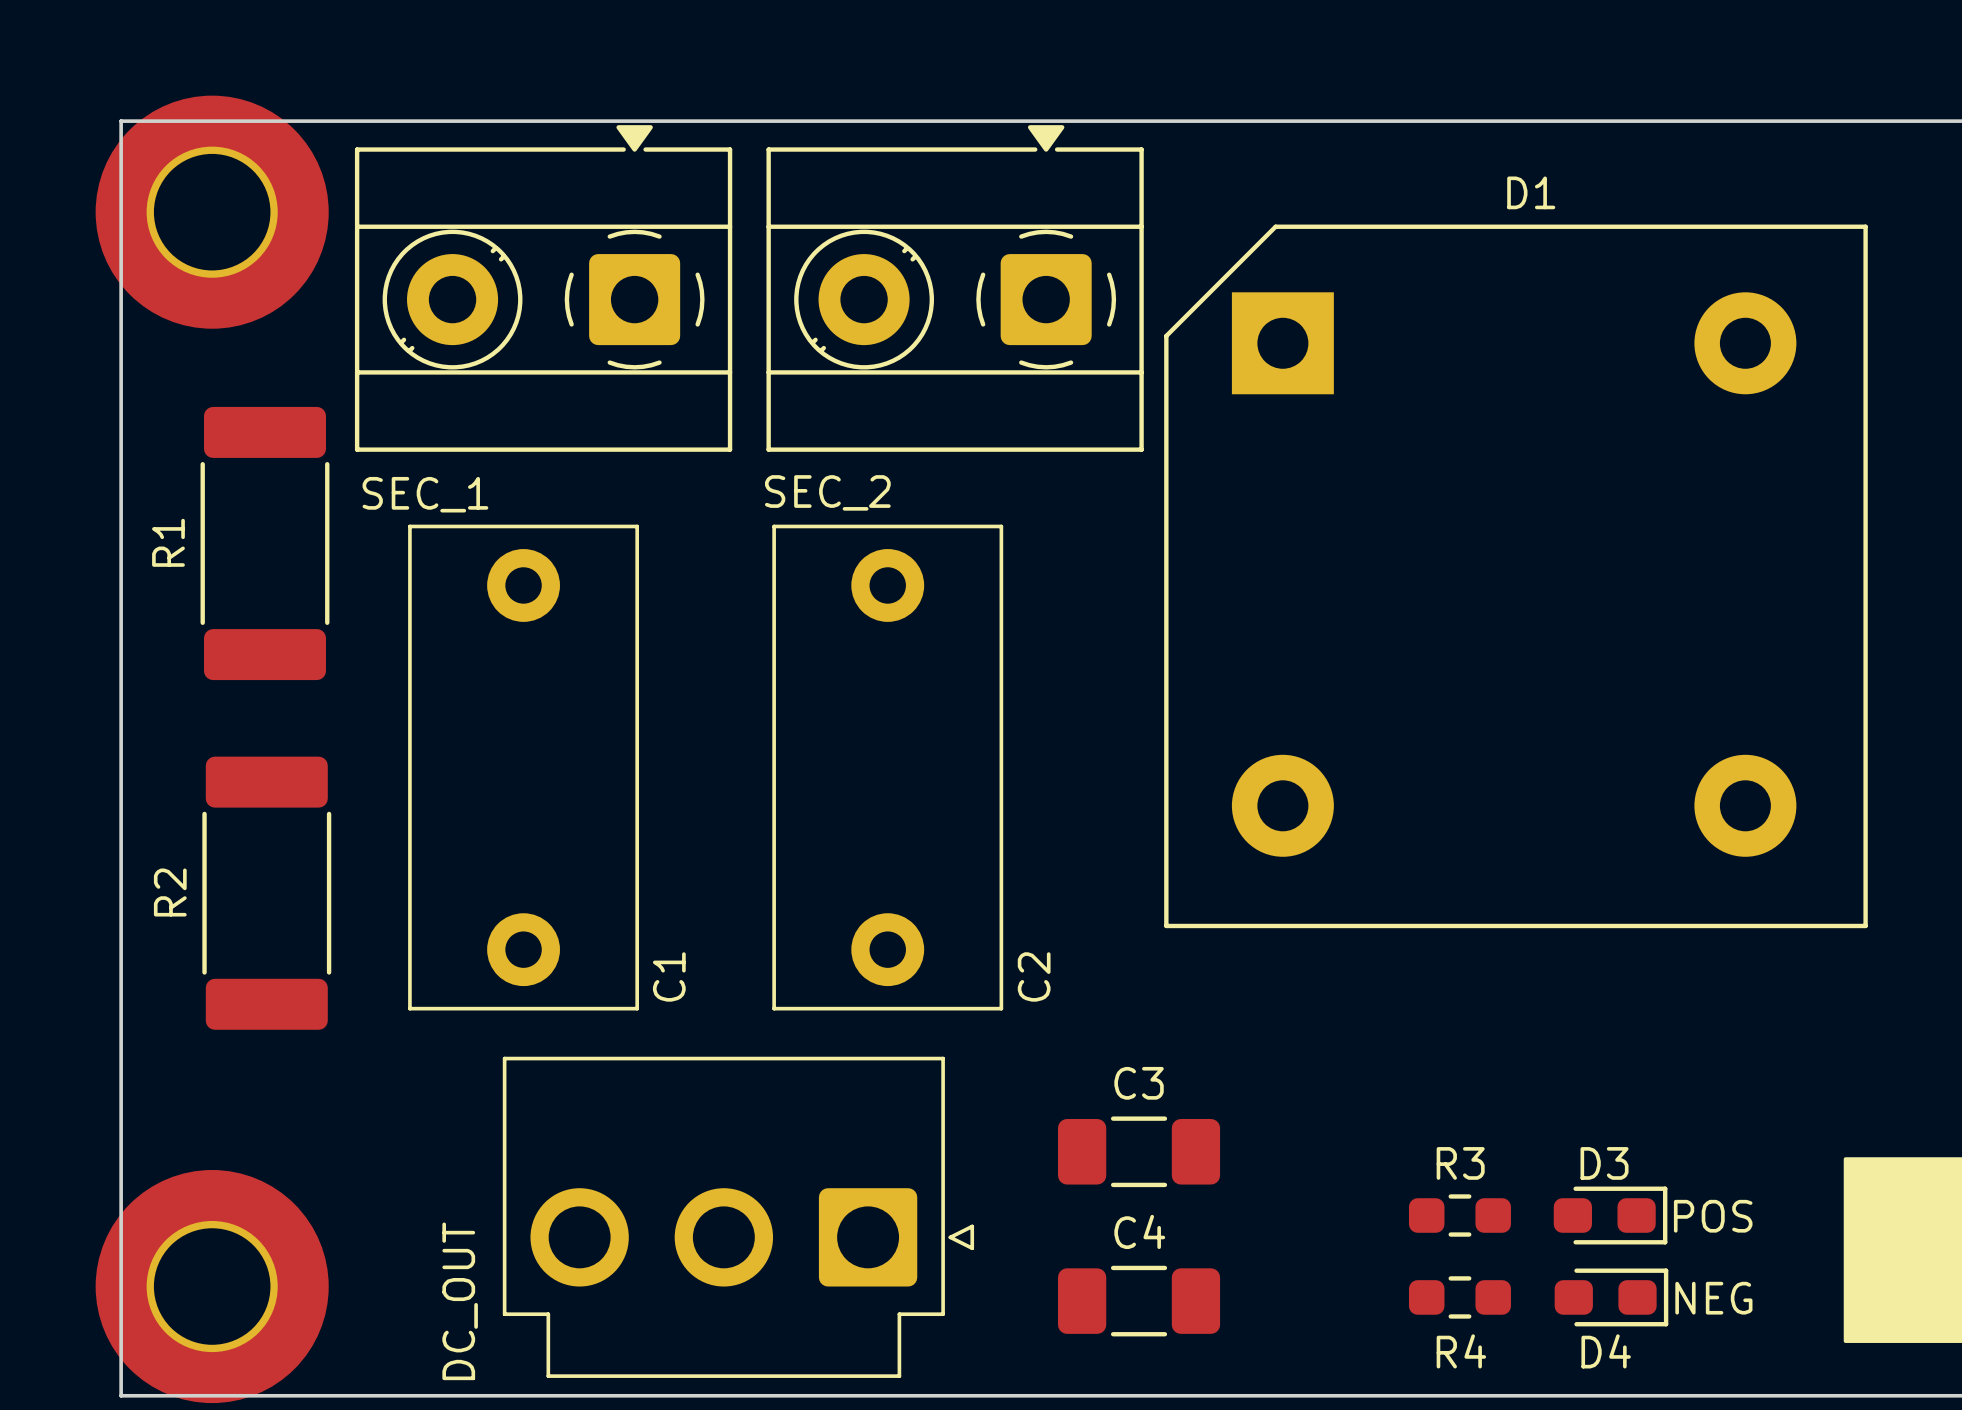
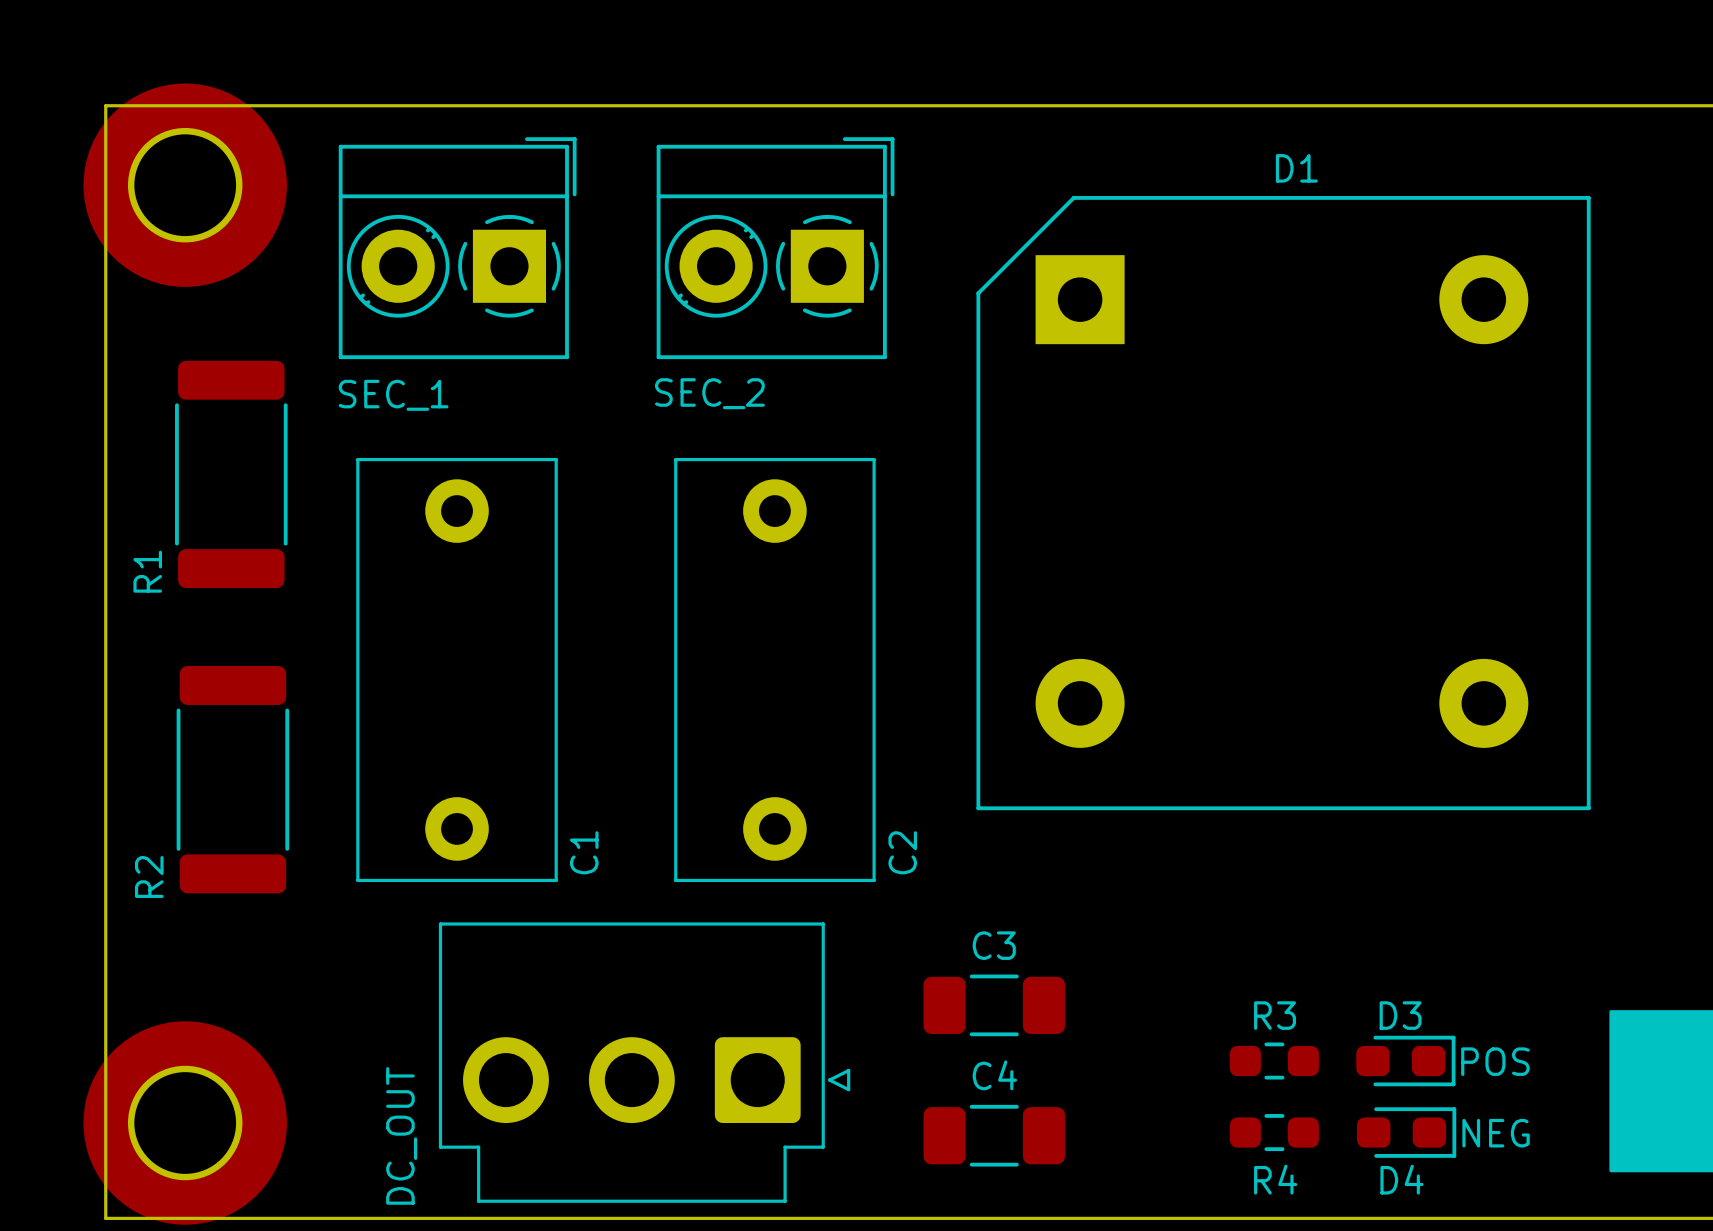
part footprint: [354, 125, 733, 452] -> [338, 137, 577, 360]
part: none -> (775, 248)
part: (955, 288) -> none
R1 footprint: [200, 406, 330, 681] -> [175, 360, 288, 589]
text position: SEC_2 (827, 492) -> SEC_2 (709, 393)
text position: SEC_1 (425, 494) -> SEC_1 (393, 395)
R1 name position: R1 (168, 542) -> R1 (147, 571)
D1 position: (1515, 576) -> (1283, 503)
R2 footprint: [202, 756, 332, 1030] -> [176, 666, 290, 894]
R2 name position: R2 (170, 892) -> R2 (149, 876)

